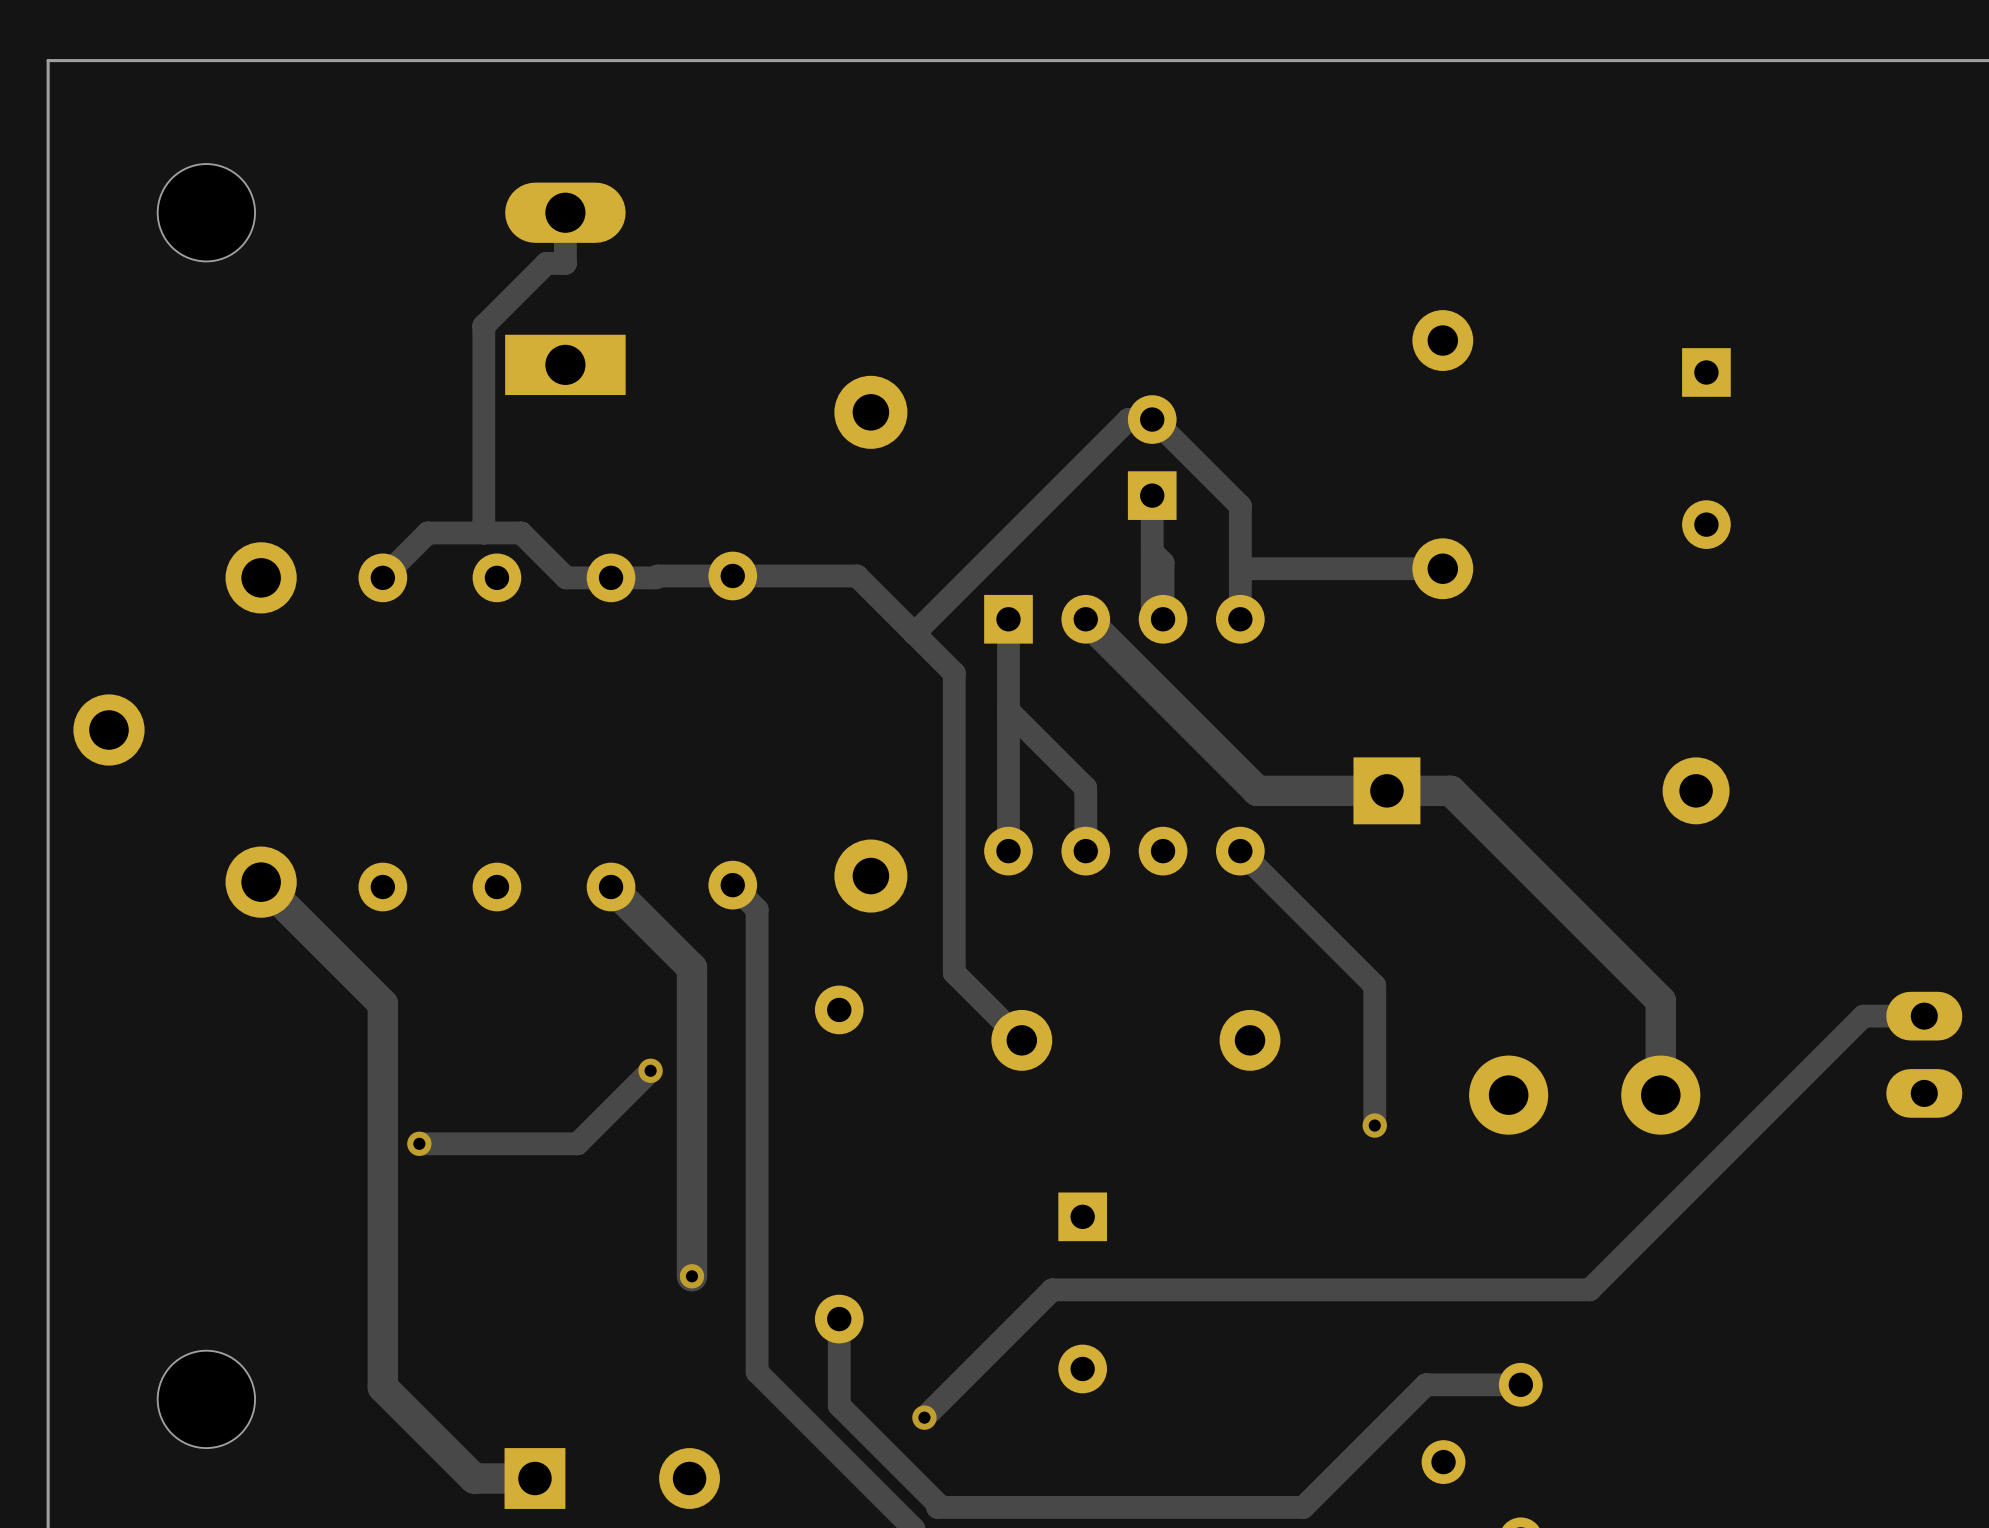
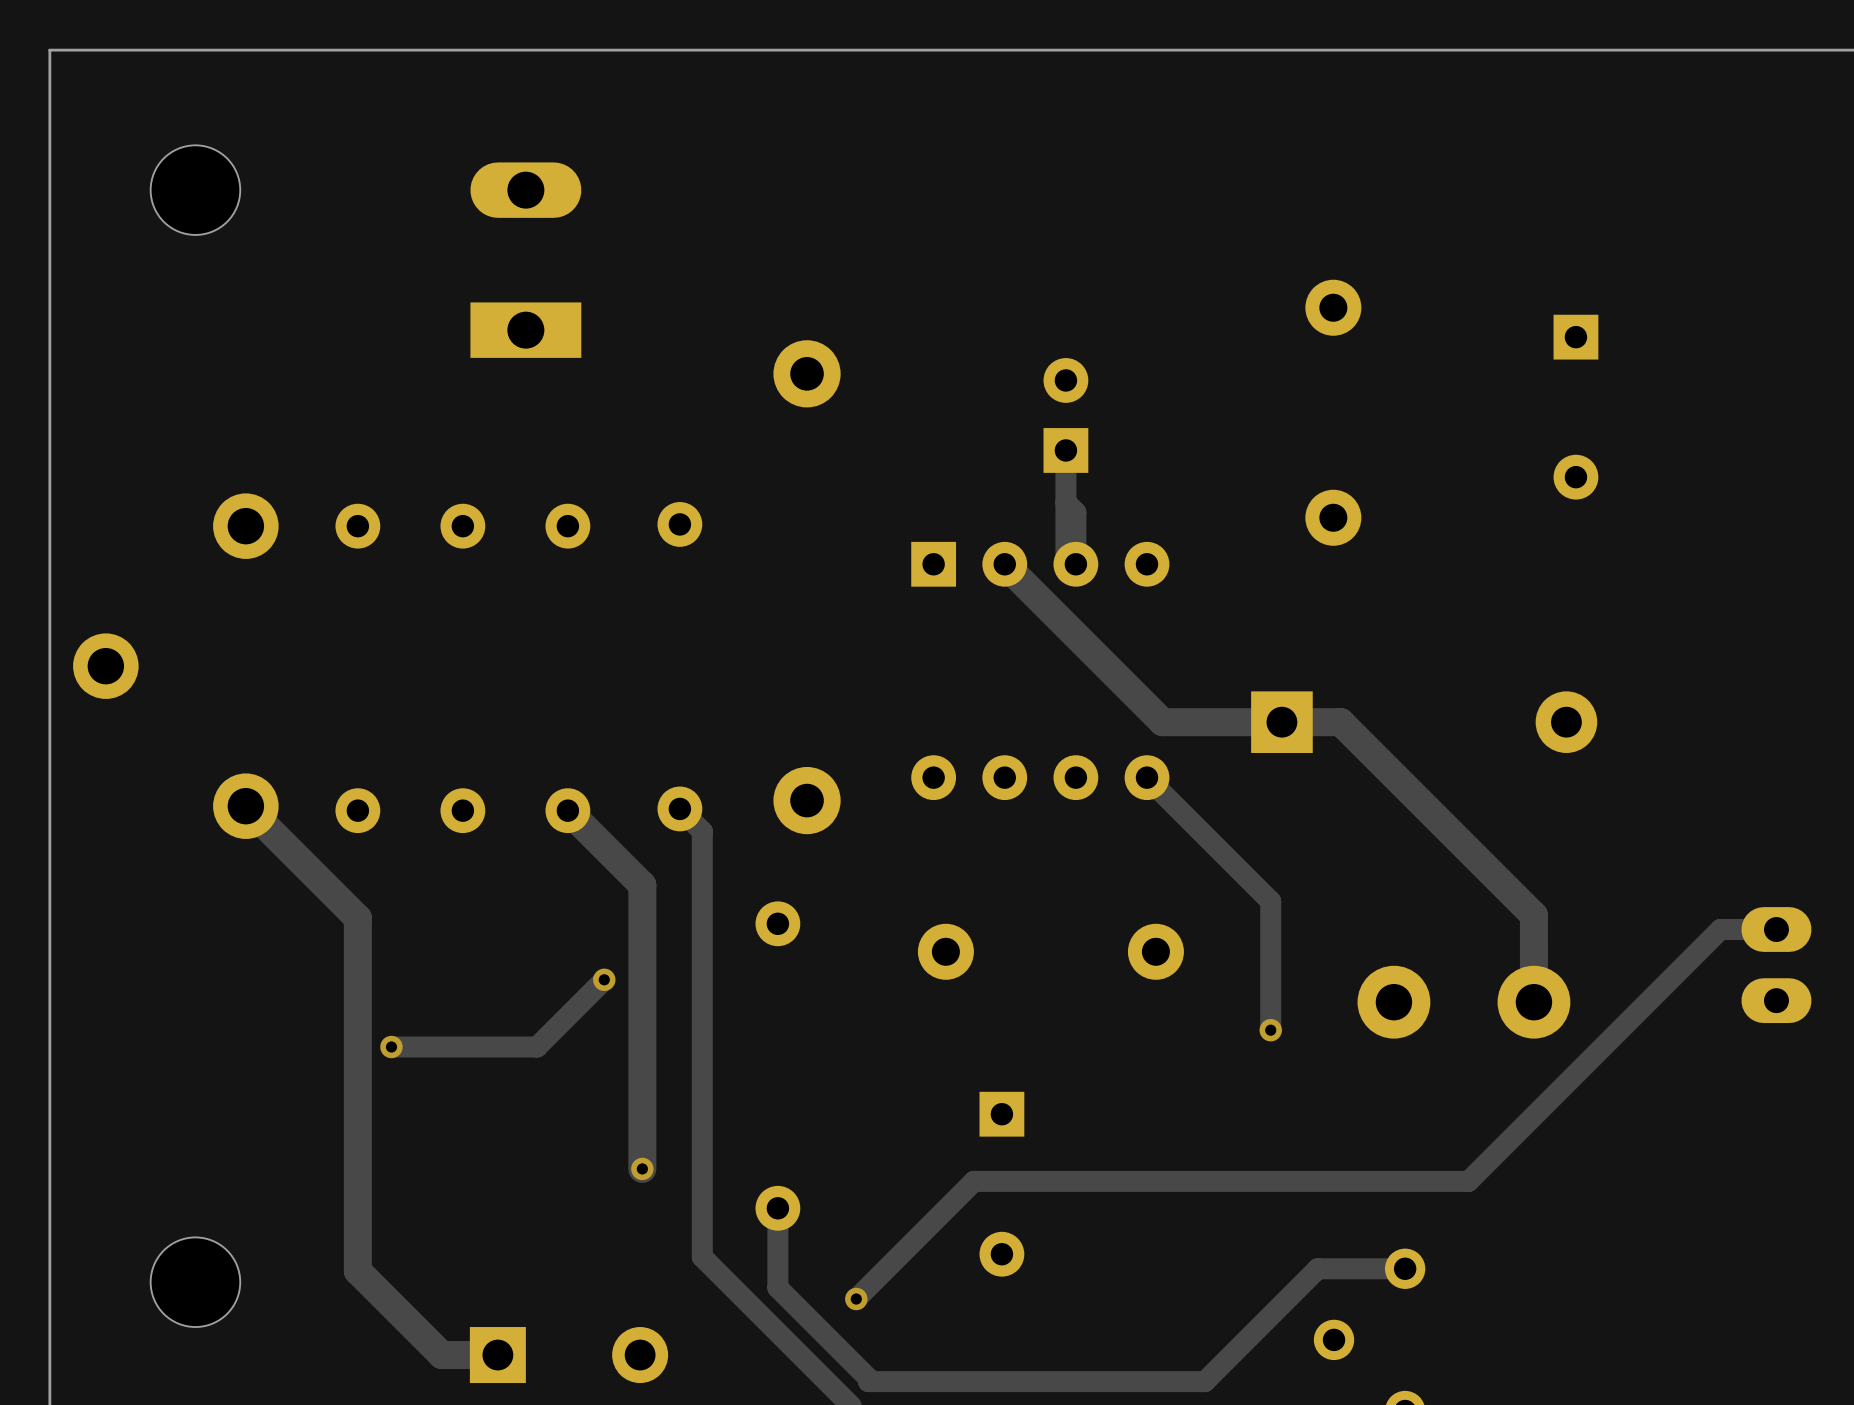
track: (565, 212) (565, 263) (546, 263) (483, 326) (483, 532) -> none
track: (1442, 568) (1240, 568) -> none
track: (382, 577) (427, 532) (521, 532) (566, 577) (857, 575) (954, 673) (954, 972) (1021, 1040) -> none
track: (1008, 619) (1008, 851) -> none
track: (1240, 619) (1240, 506) (1153, 419) (1128, 419) (914, 633) -> none
track: (1008, 710) (1085, 787) (1085, 851) -> none

